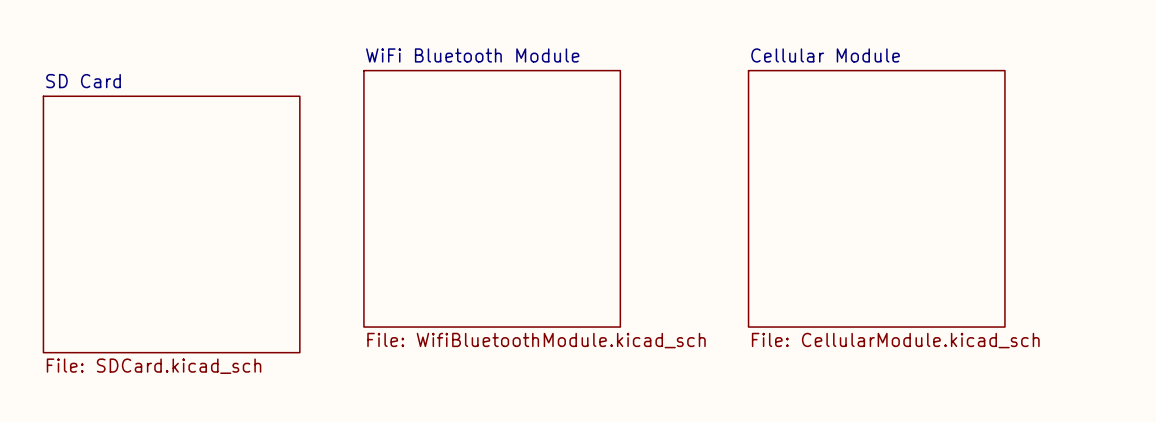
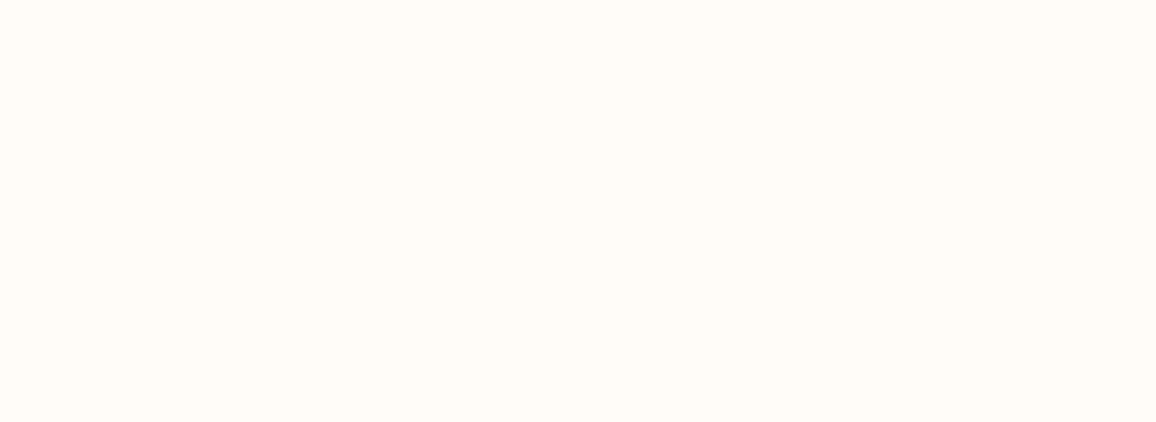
sheet WiFi Bluetooth Module: File: WifiBluetoothModule.kicad_sch (492, 198) -> none
sheet Cellular Module: File: CellularModule.kicad_sch (876, 198) -> none
sheet SD Card: File: SDCard.kicad_sch (171, 224) -> none

